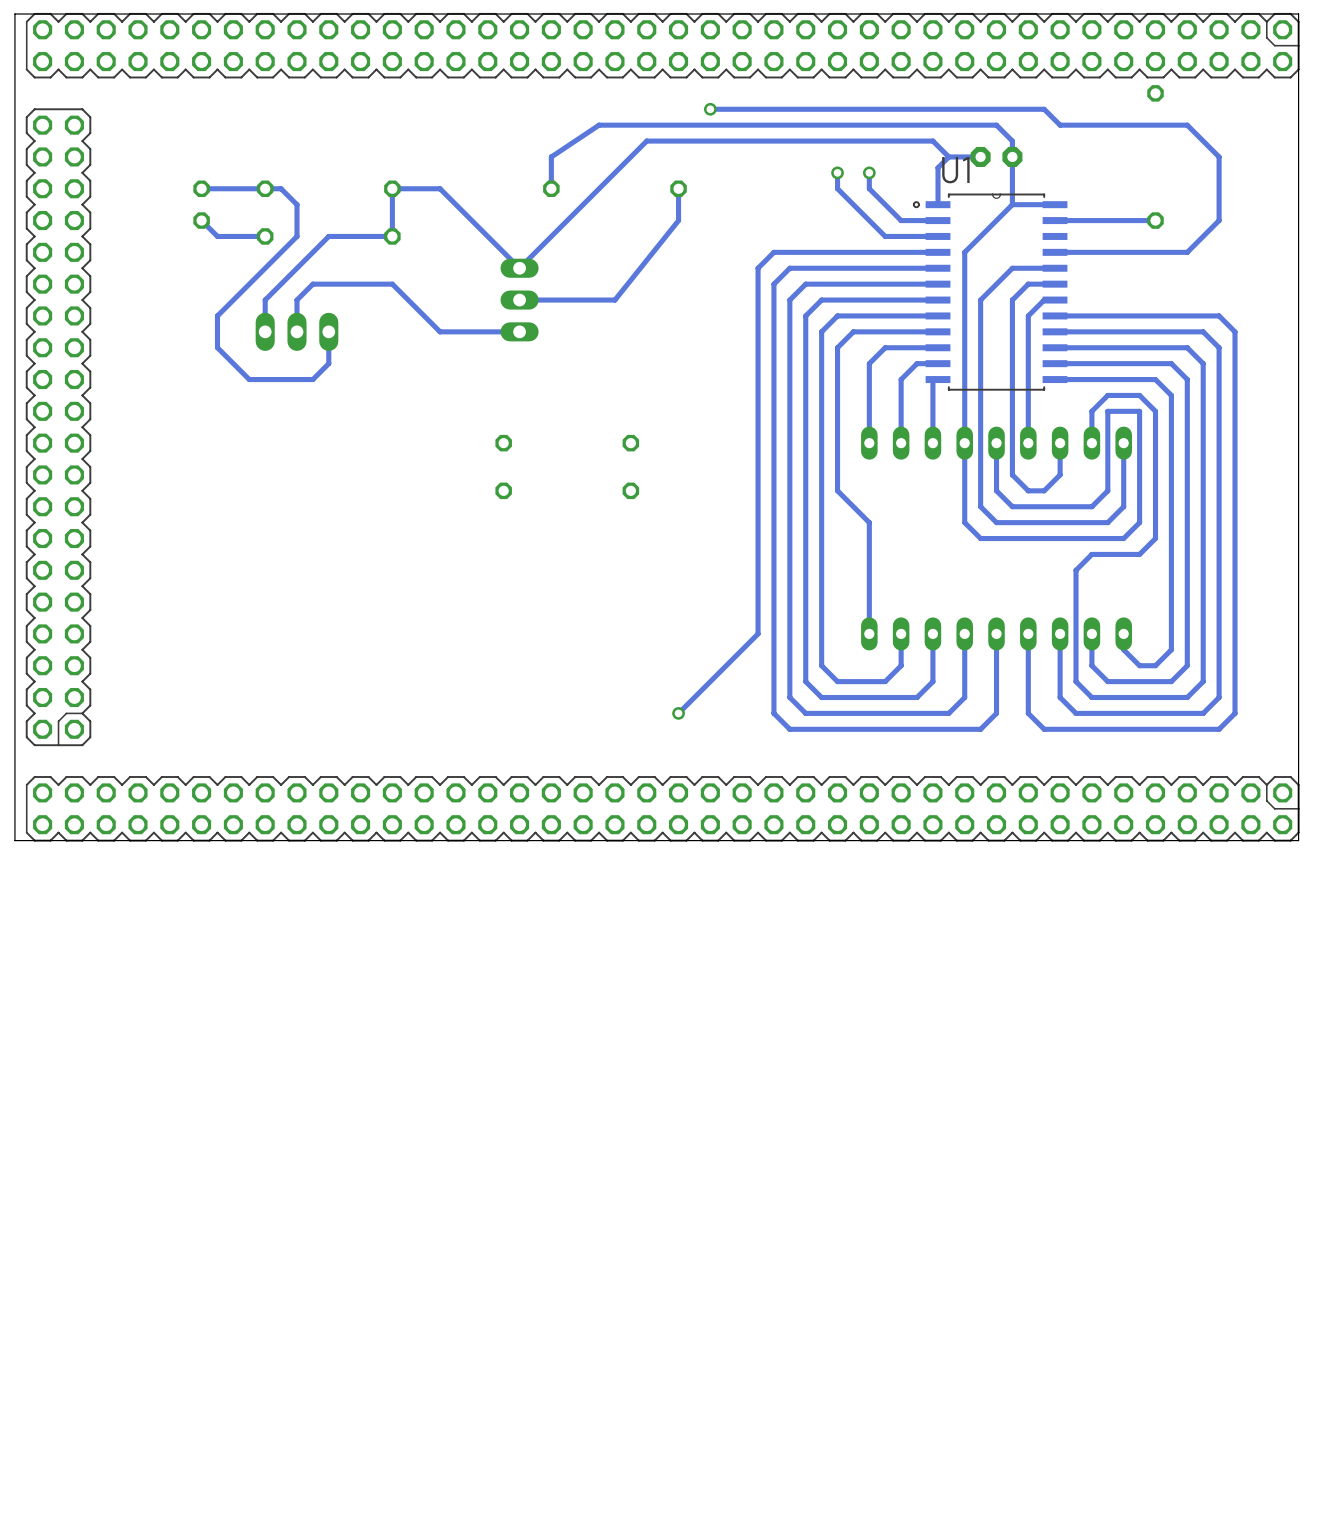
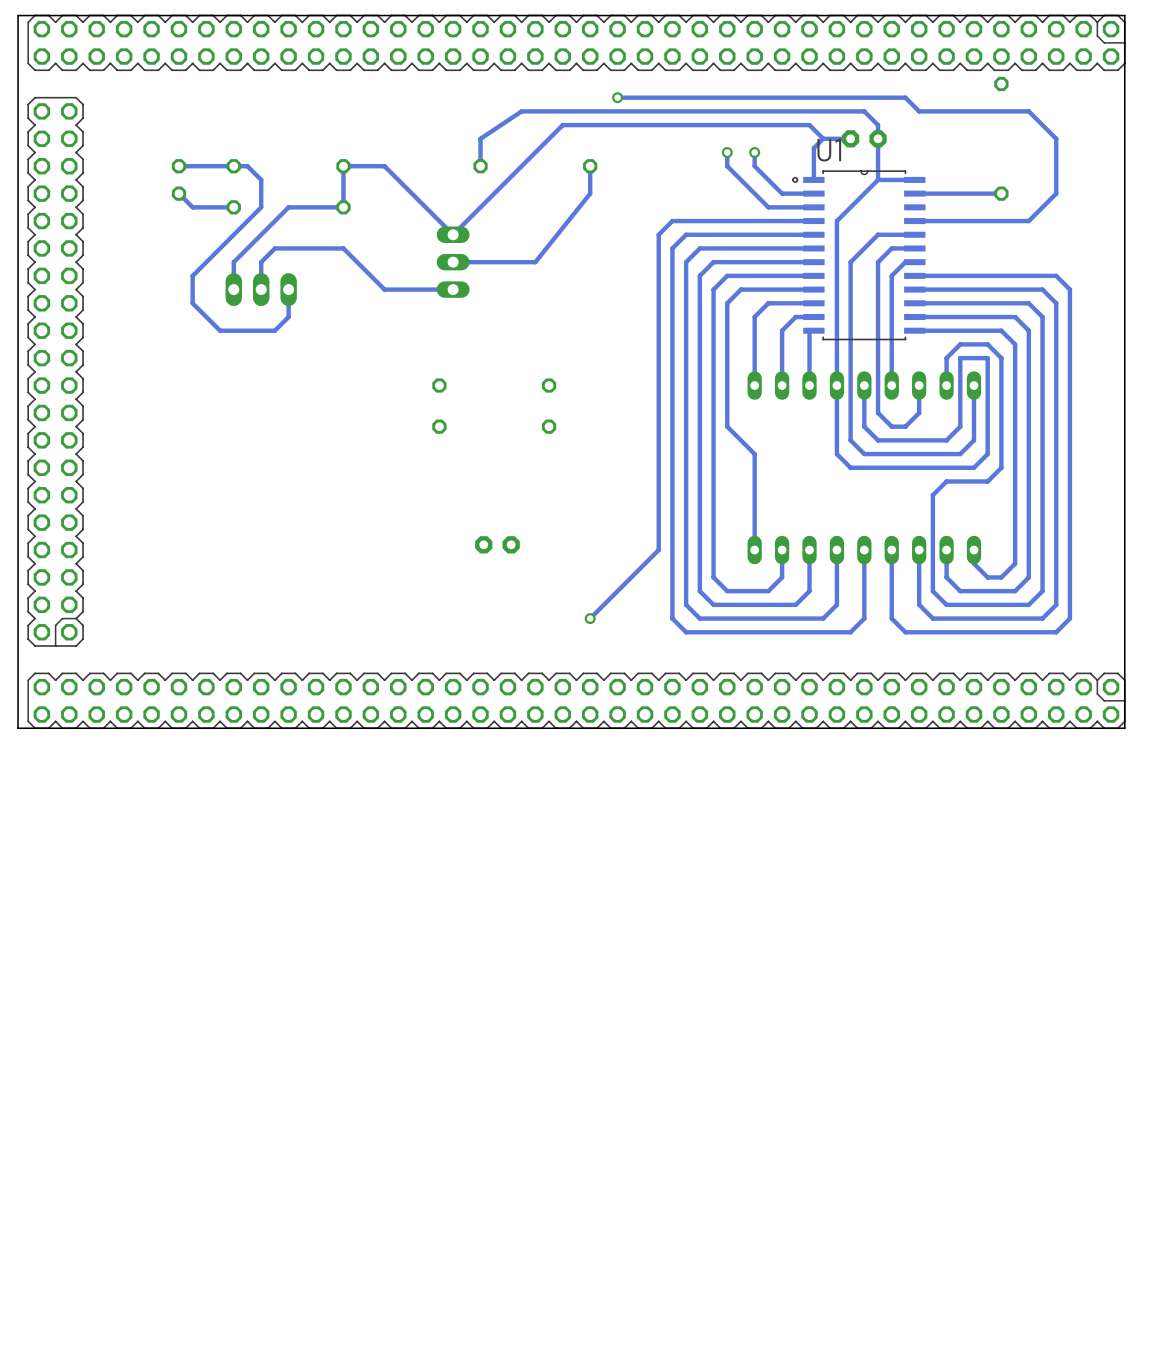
part: none -> (497, 544)

